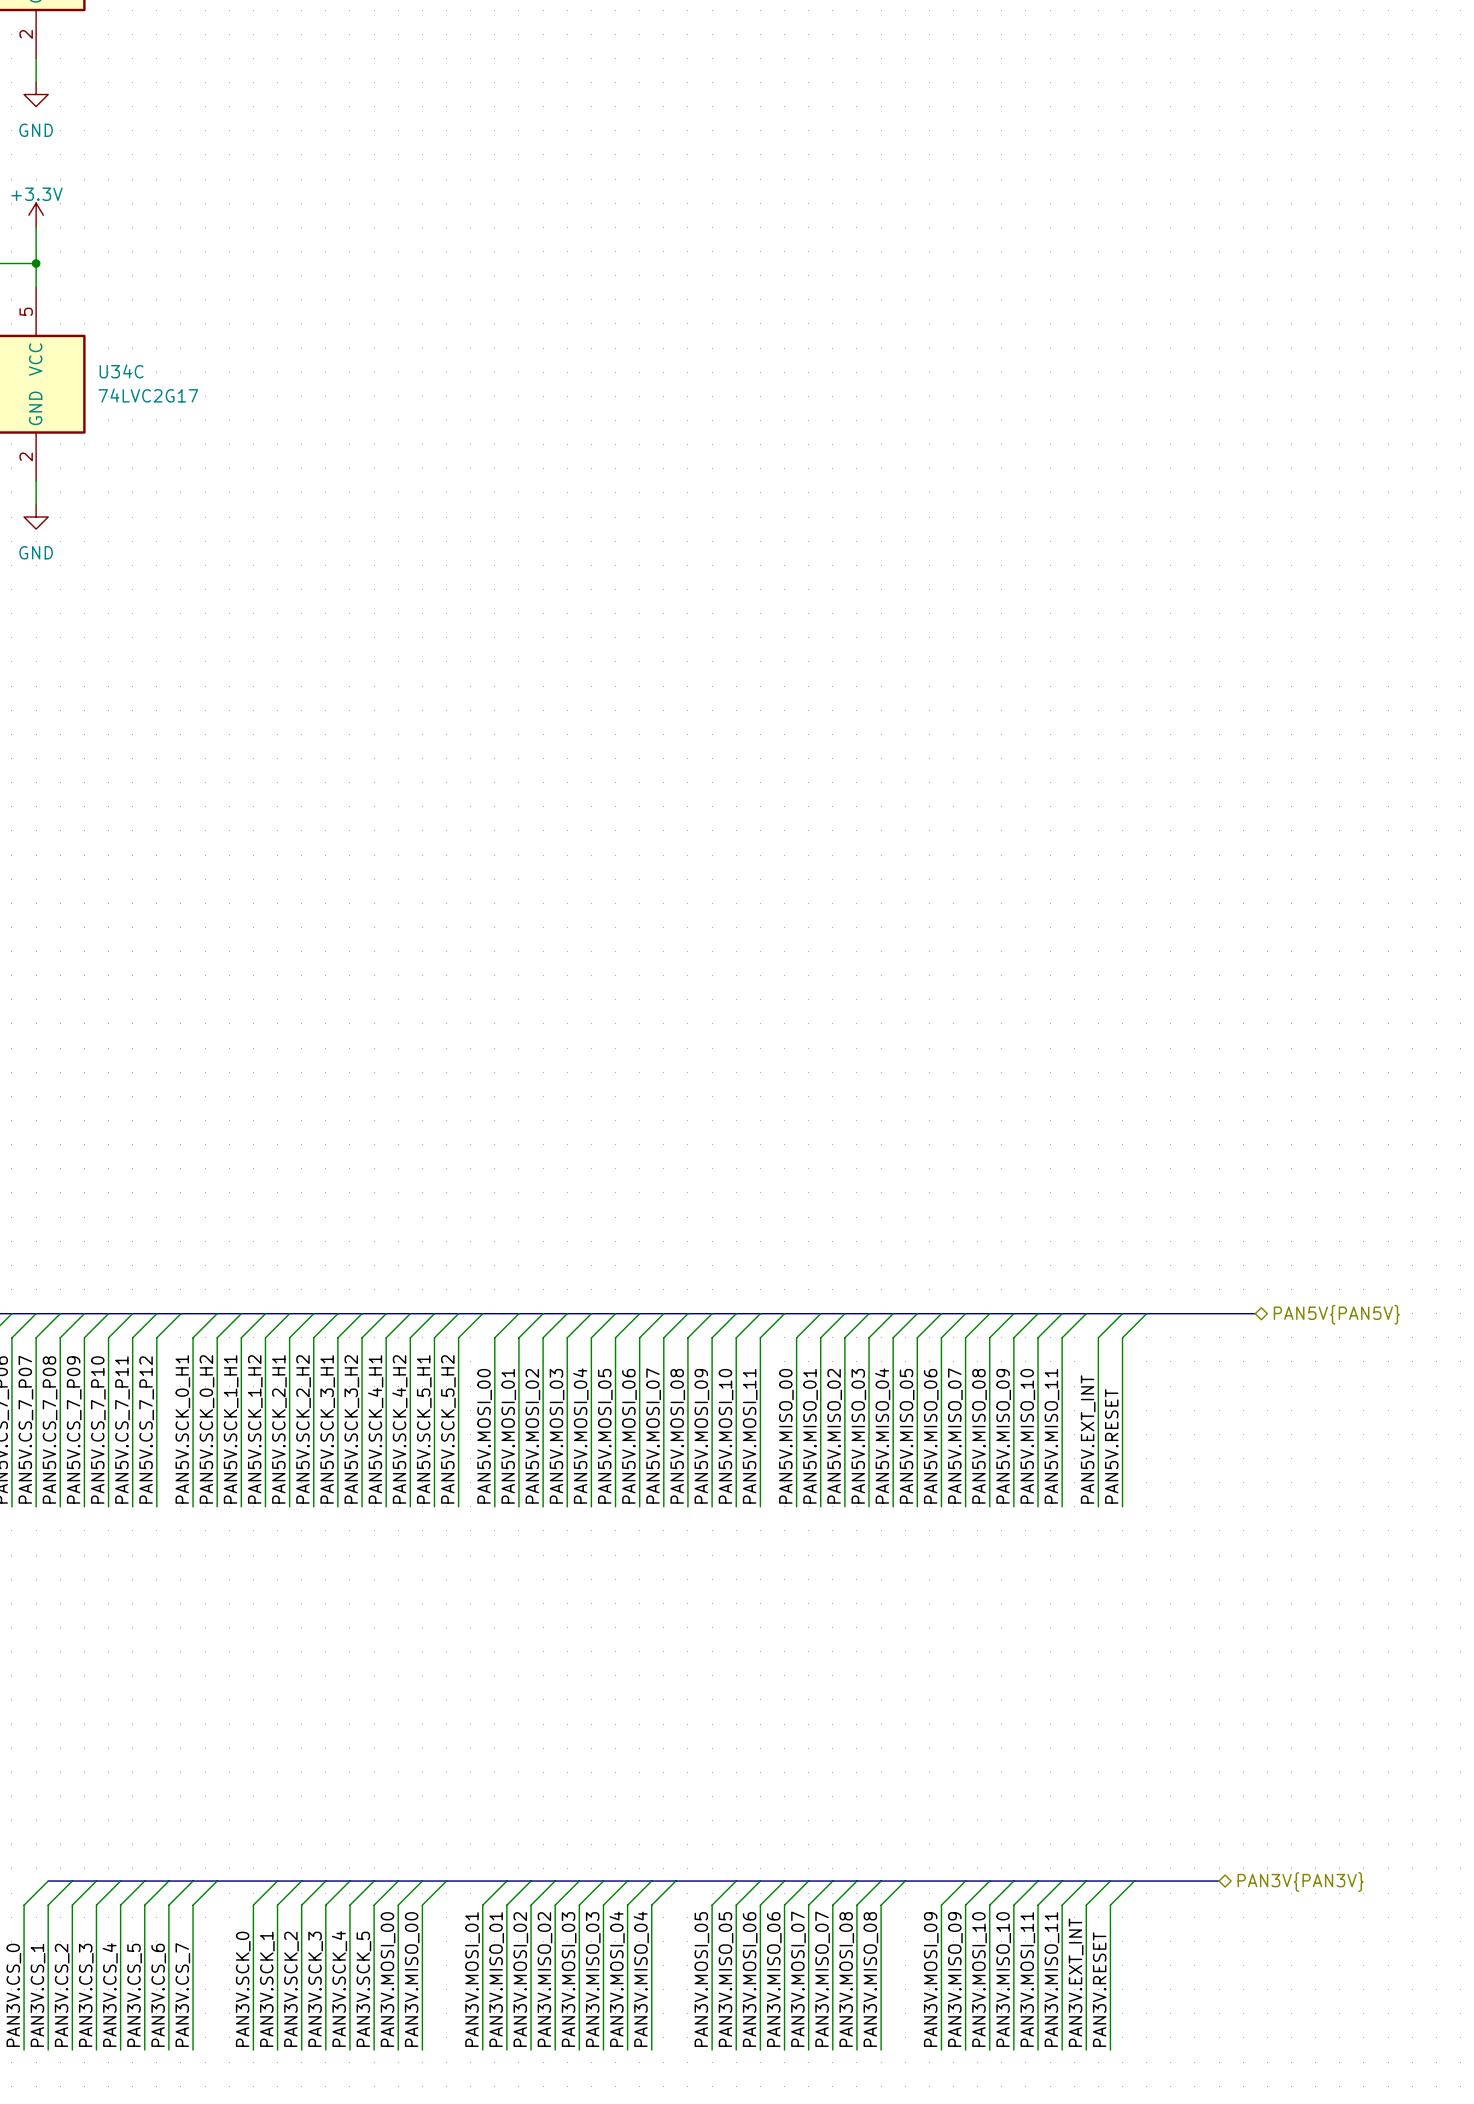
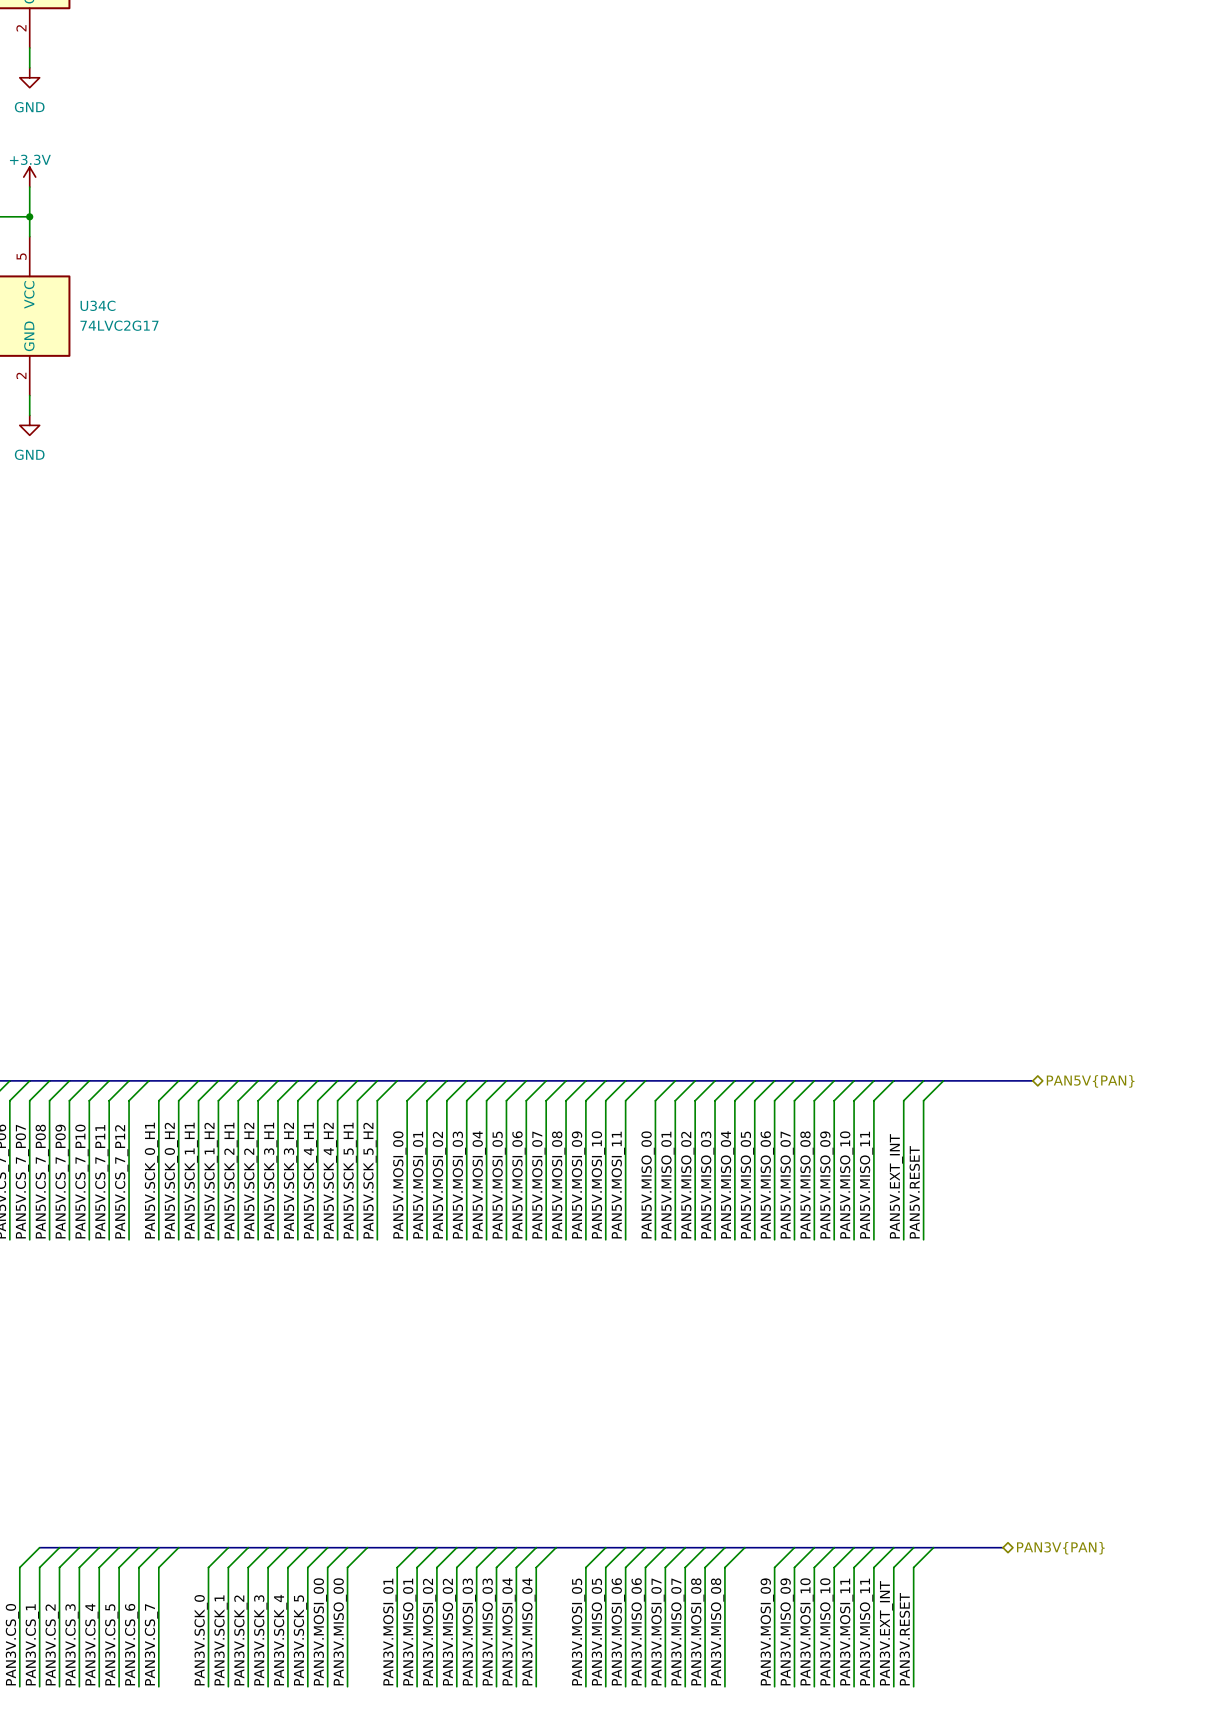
hierarchical label: PAN5V{PAN5V} (1336, 1314) -> PAN5V{PAN} (1090, 1081)
hierarchical label: PAN3V{PAN3V} (1300, 1882) -> PAN3V{PAN} (1060, 1548)

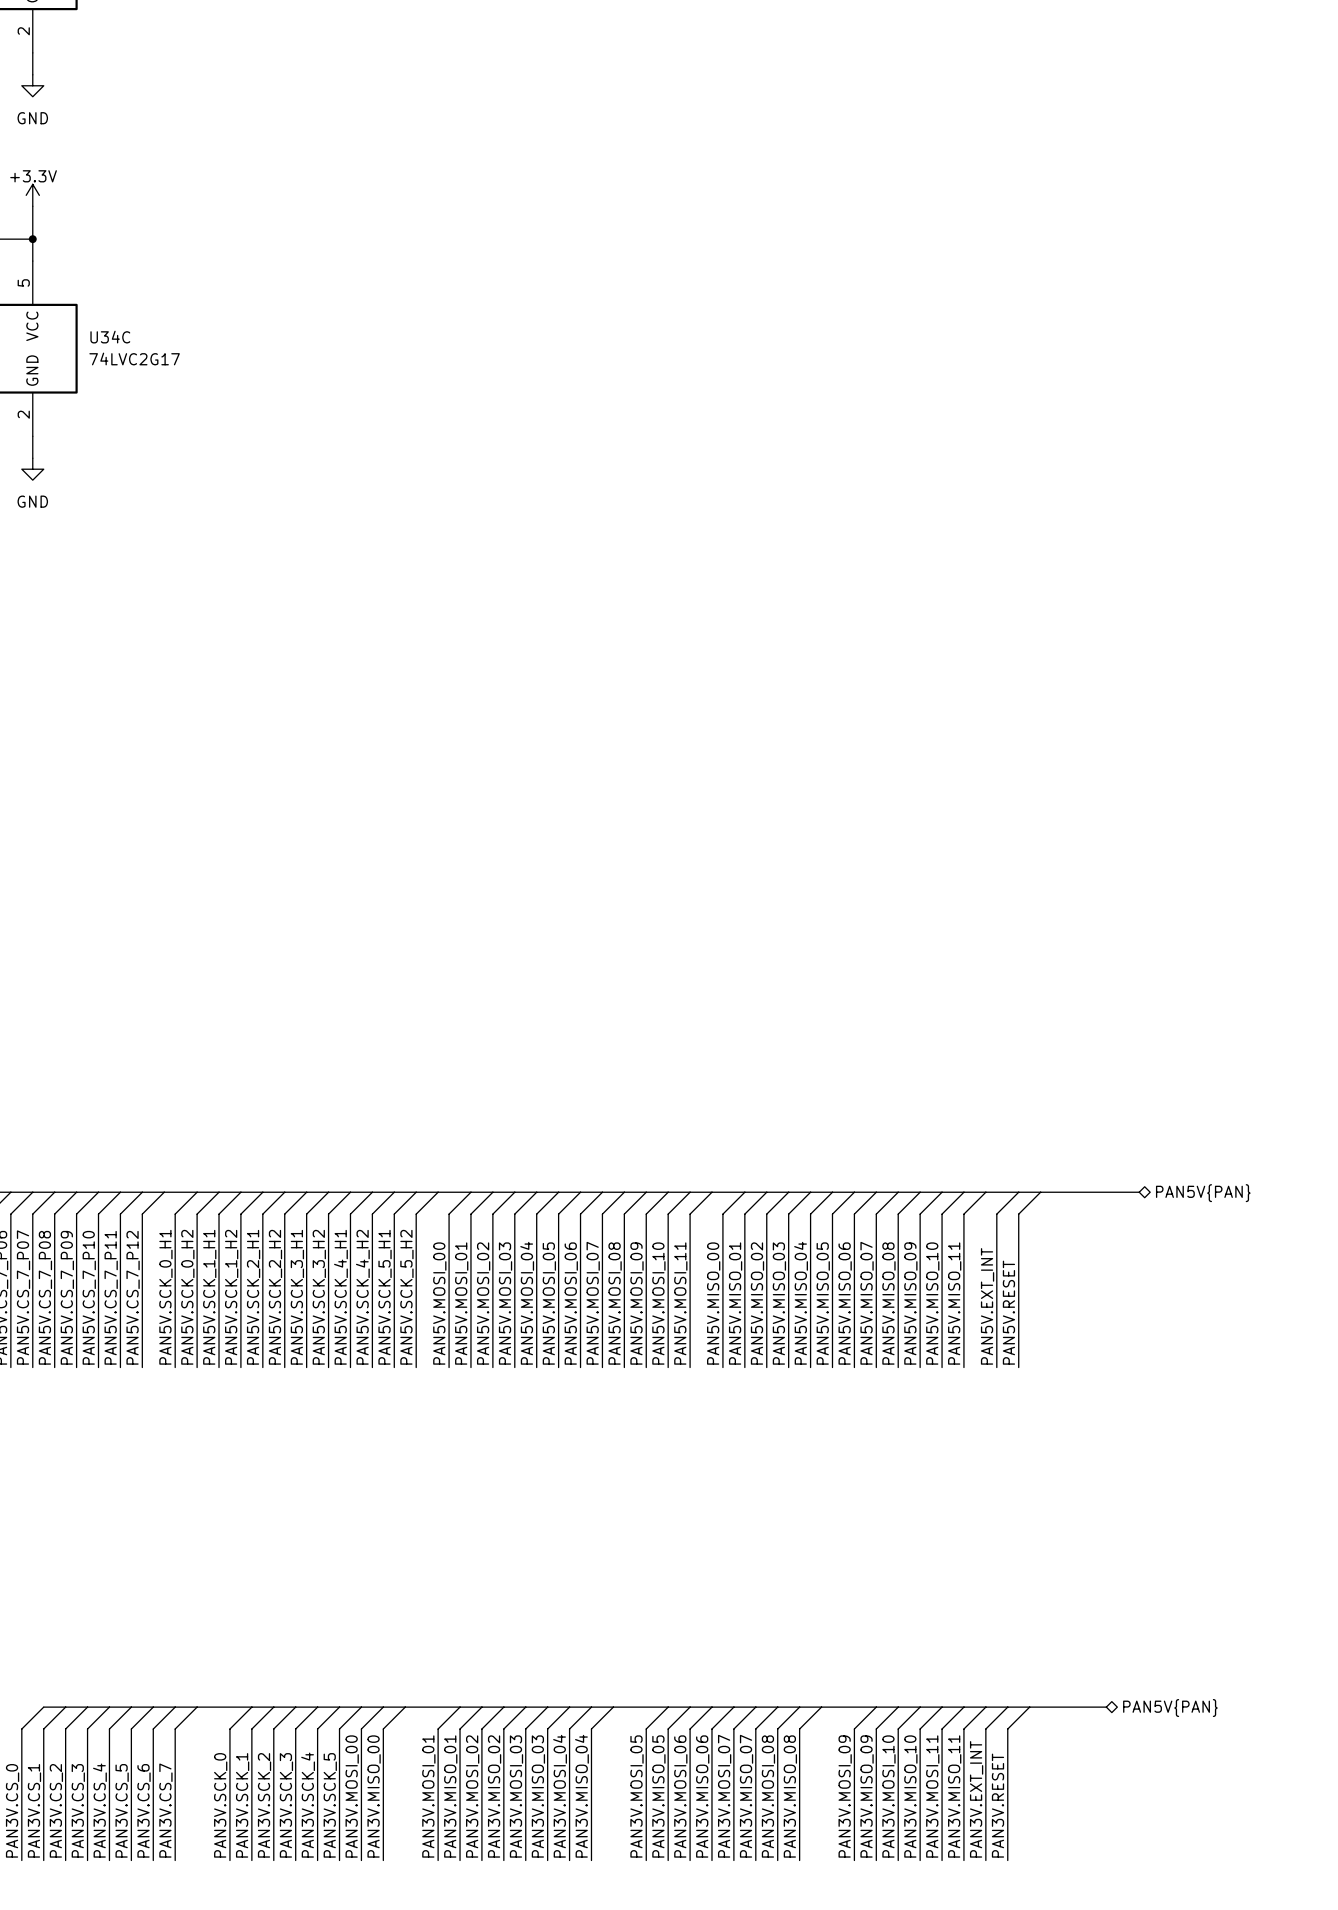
hierarchical label: PAN3V{PAN} (1060, 1548) -> PAN5V{PAN} (1170, 1708)

